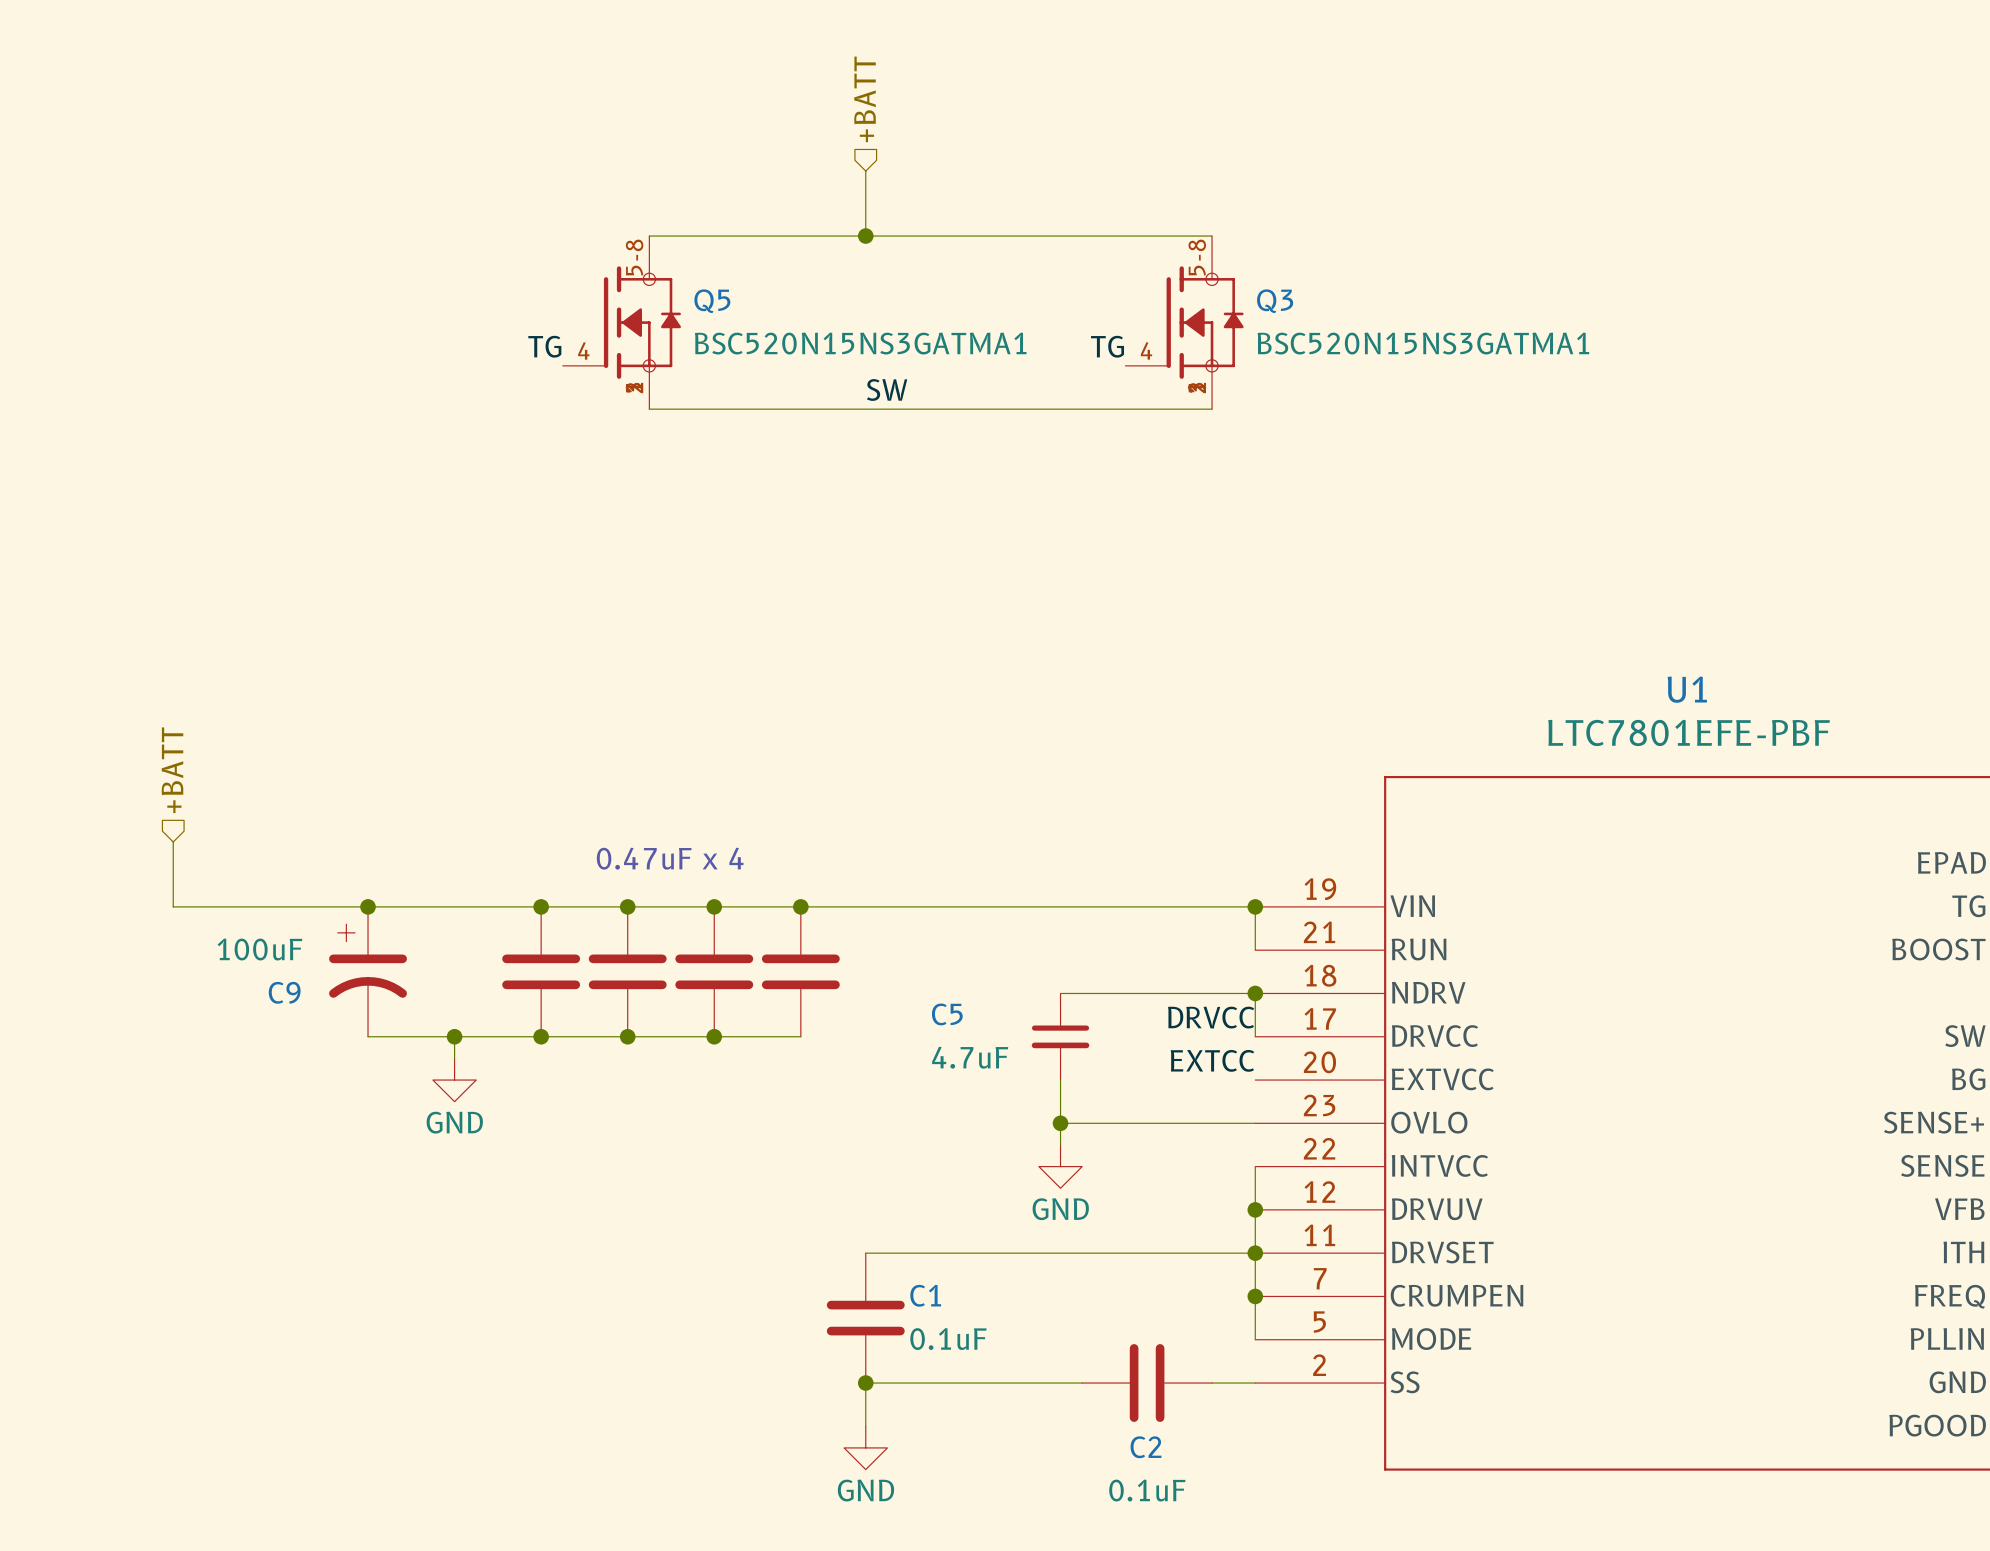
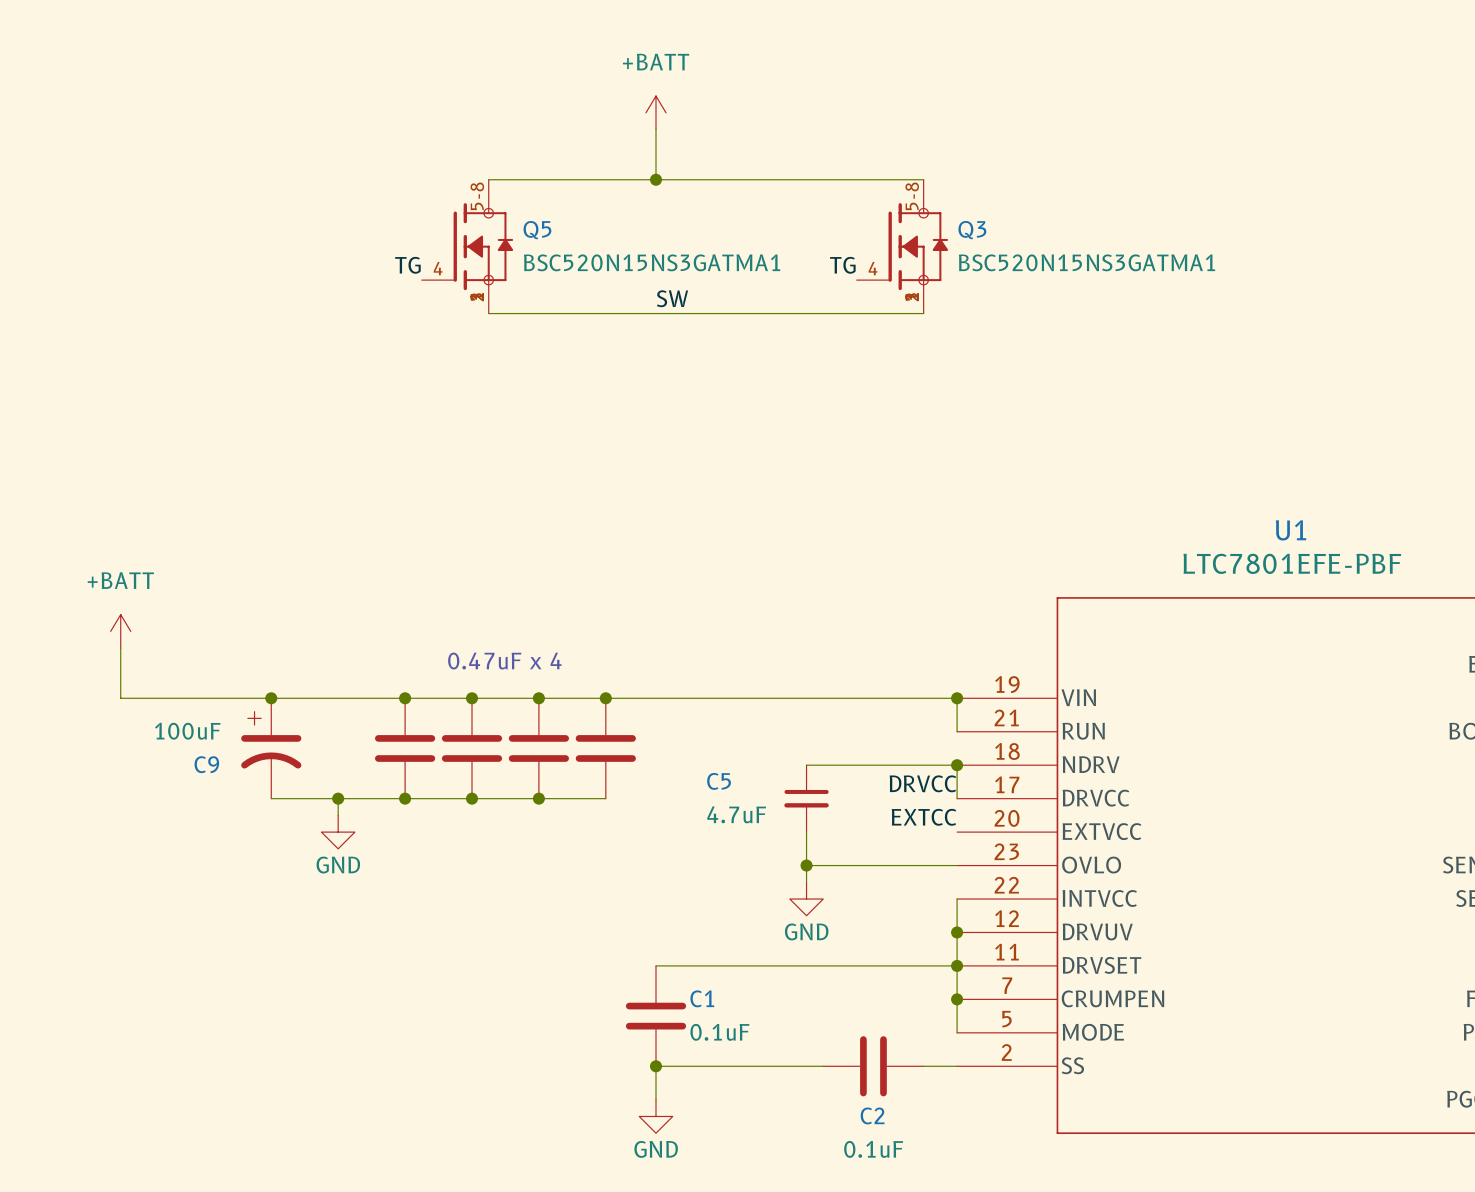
hierarchical label: +BATT (864, 99) -> none
power symbol: none -> +BATT (656, 112)
hierarchical label: +BATT (172, 770) -> none
power symbol: none -> +BATT (120, 631)

